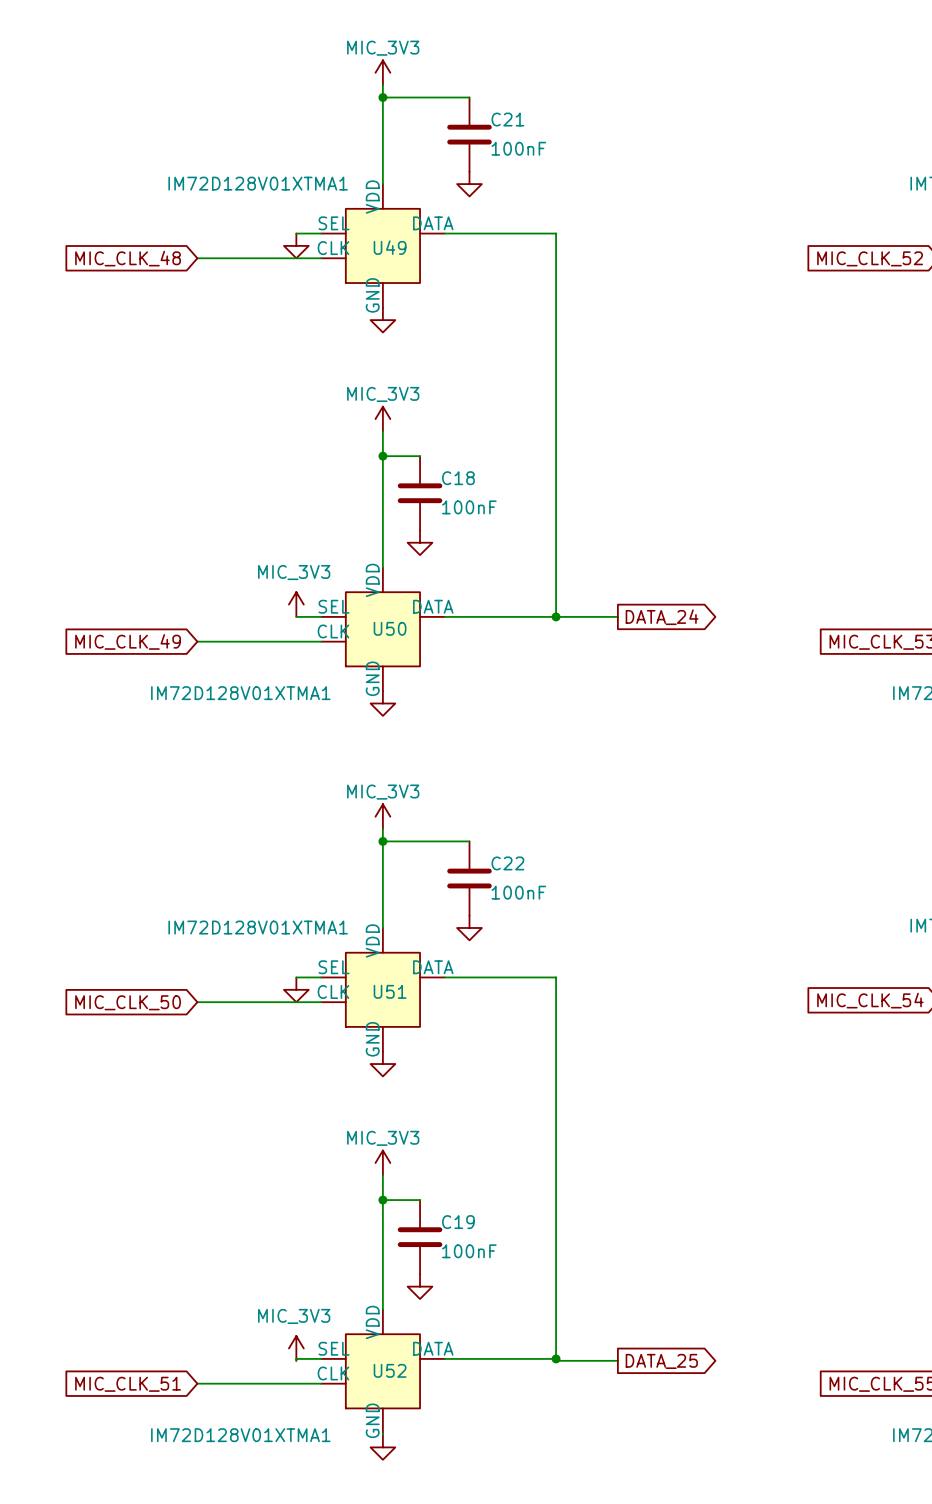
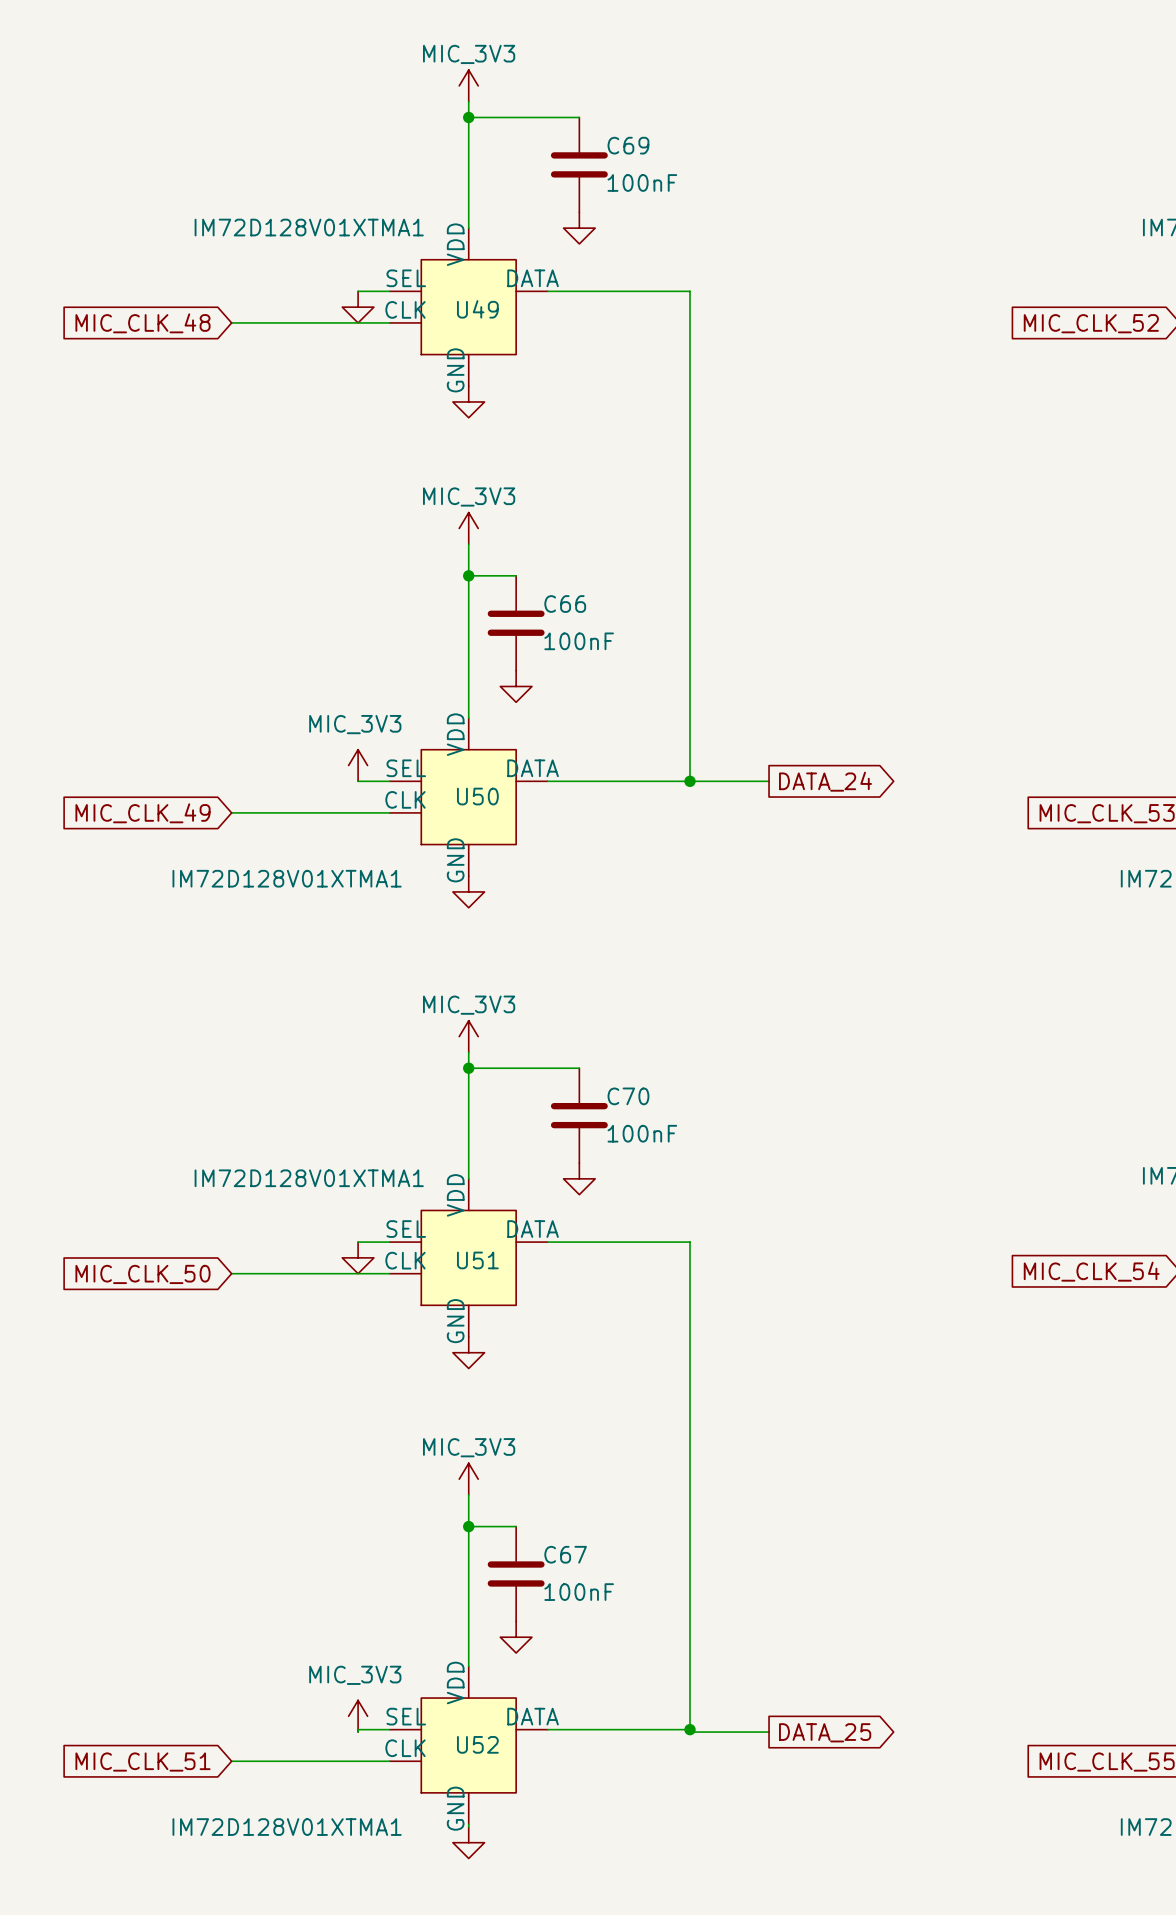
C21 name: C21 (507, 119) -> C69 (628, 145)
C18 name: C18 (458, 478) -> C66 (565, 604)
C22 name: C22 (507, 863) -> C70 (628, 1096)
C19 name: C19 (458, 1222) -> C67 (565, 1554)

